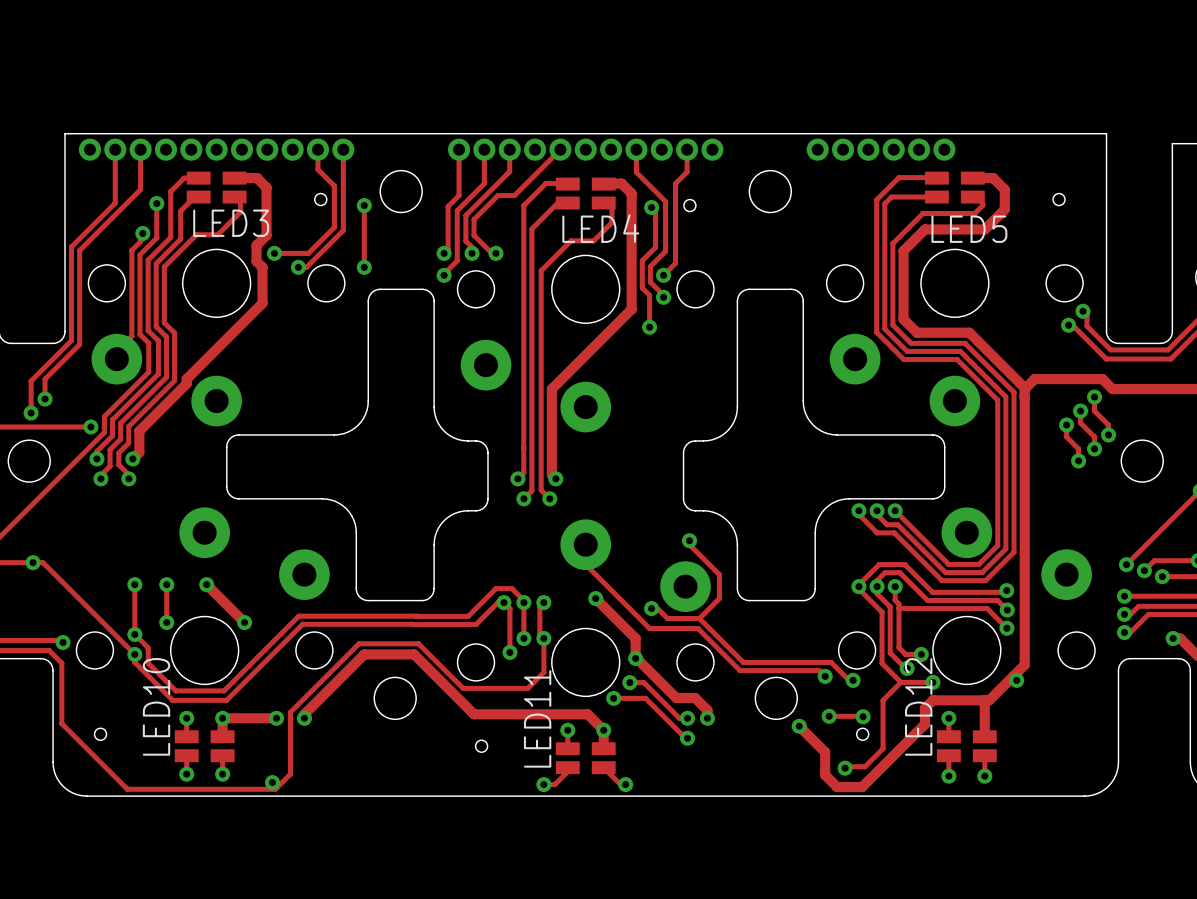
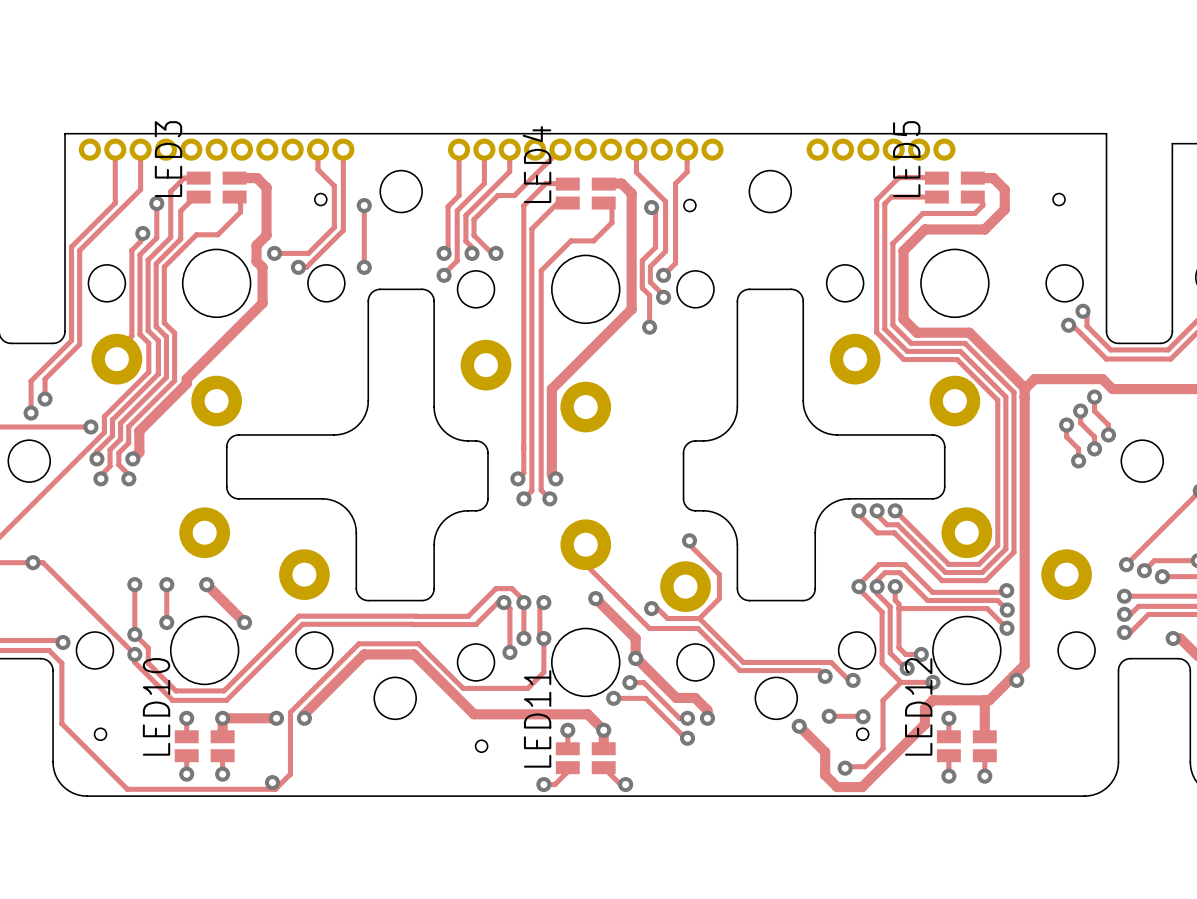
LED3 name rotation: 0° (231, 223) -> 90° counterclockwise (168, 159)
LED4 name rotation: 0° (600, 228) -> 90° counterclockwise (537, 164)
LED5 name rotation: 0° (969, 229) -> 90° counterclockwise (906, 159)
LED5 name position: LED5 (969, 229) -> LED5 (906, 159)

